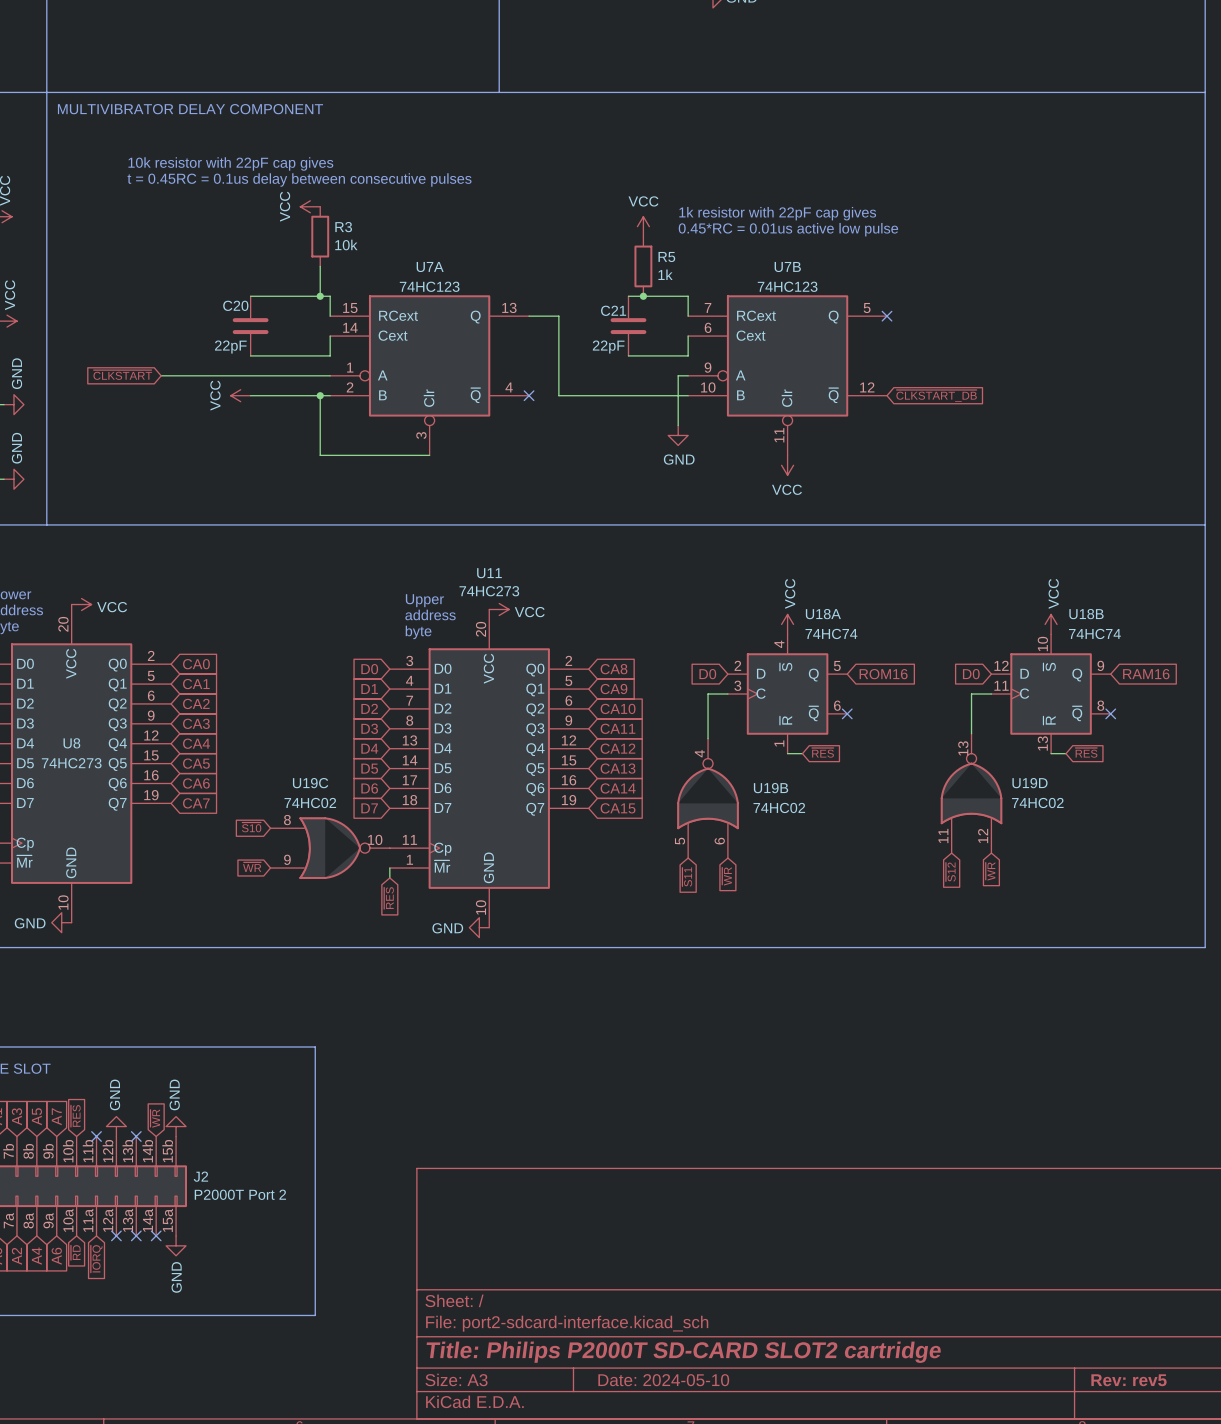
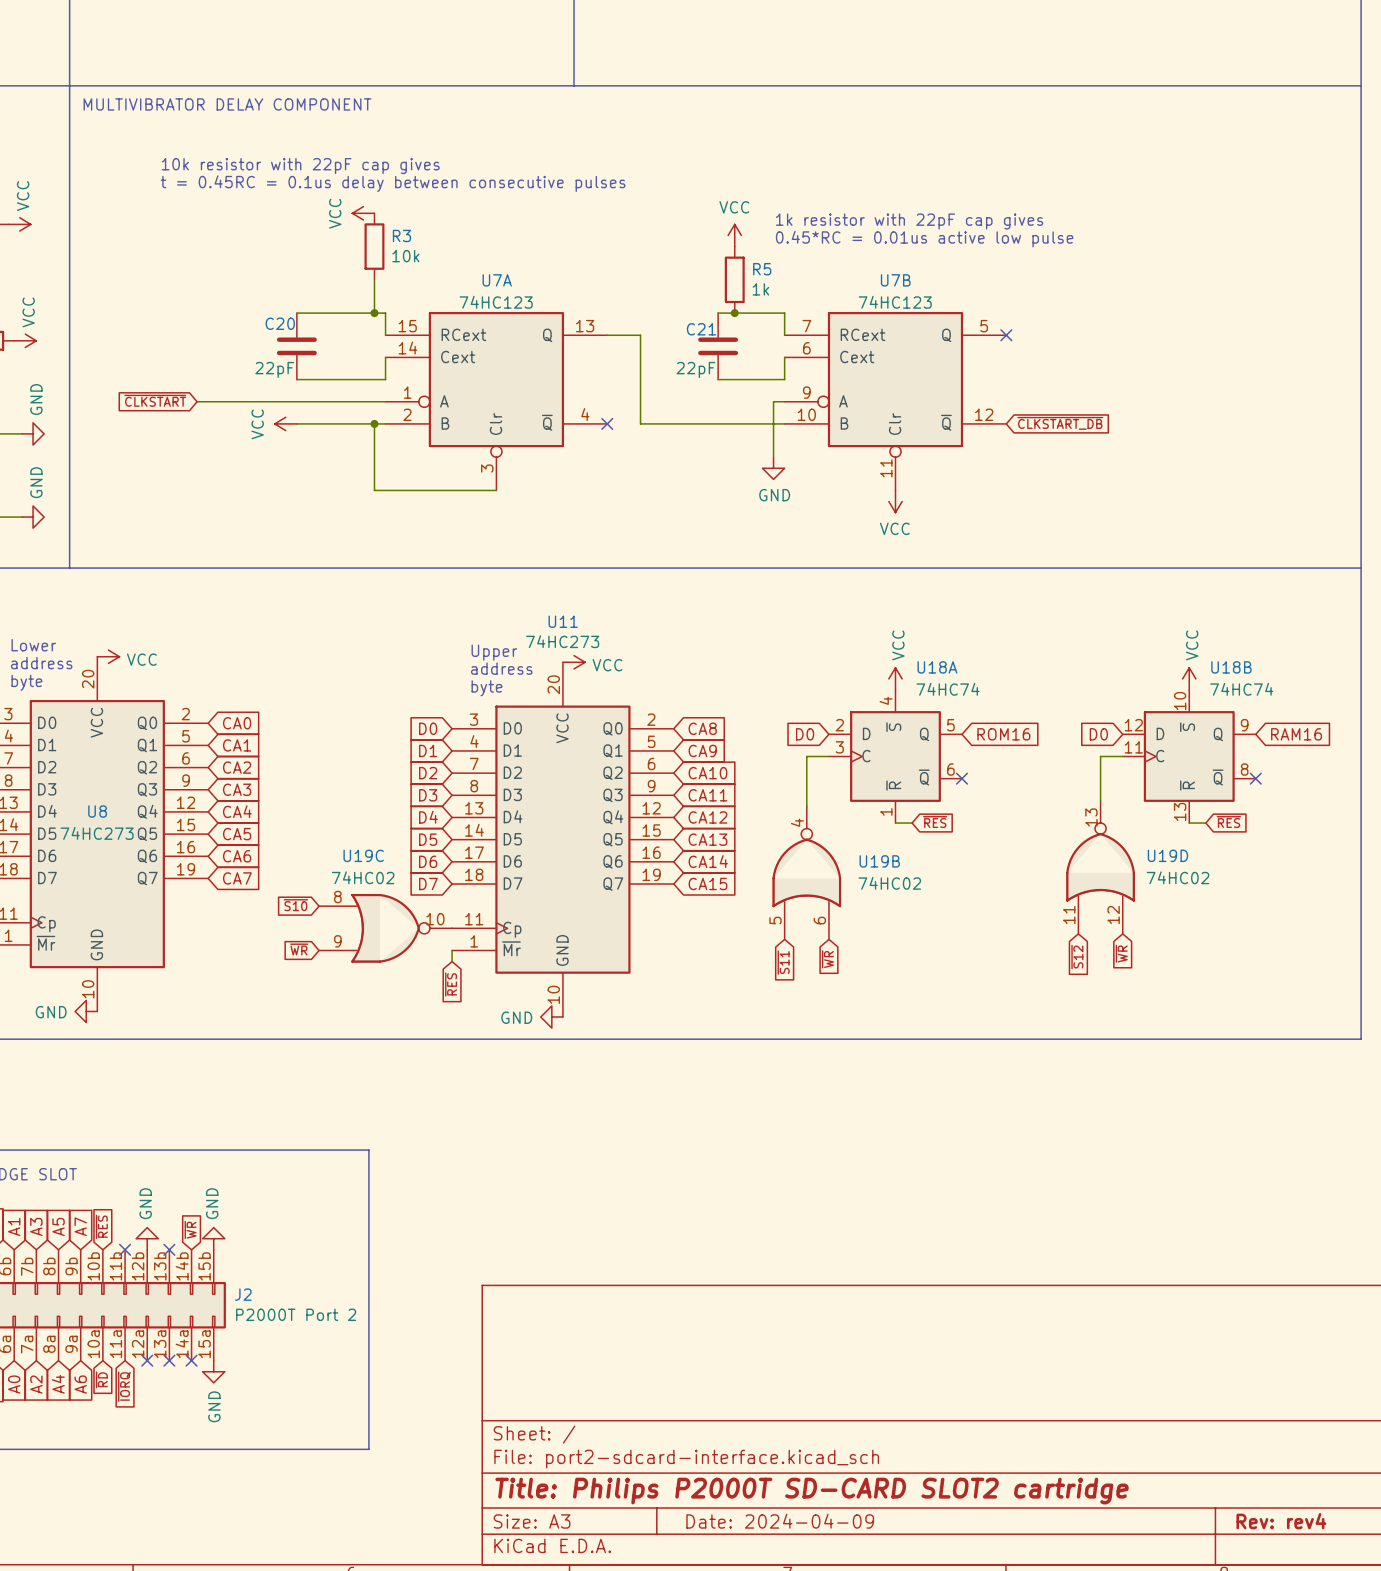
title block: Date: 2024-05-10 (663, 1380) -> Date: 2024-04-09 (780, 1521)
title block: Rev: rev5 (1128, 1380) -> Rev: rev4 (1281, 1521)

